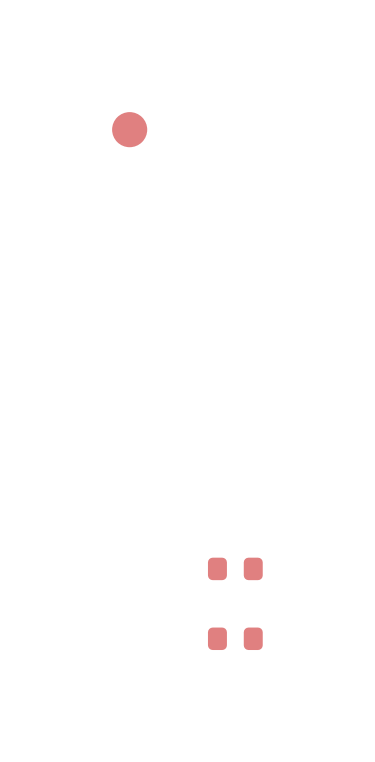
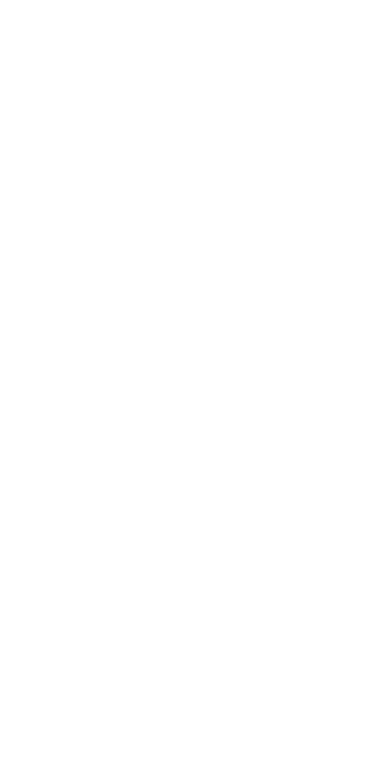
part: (129, 129) -> none
part: (235, 568) -> none
part: (235, 638) -> none

